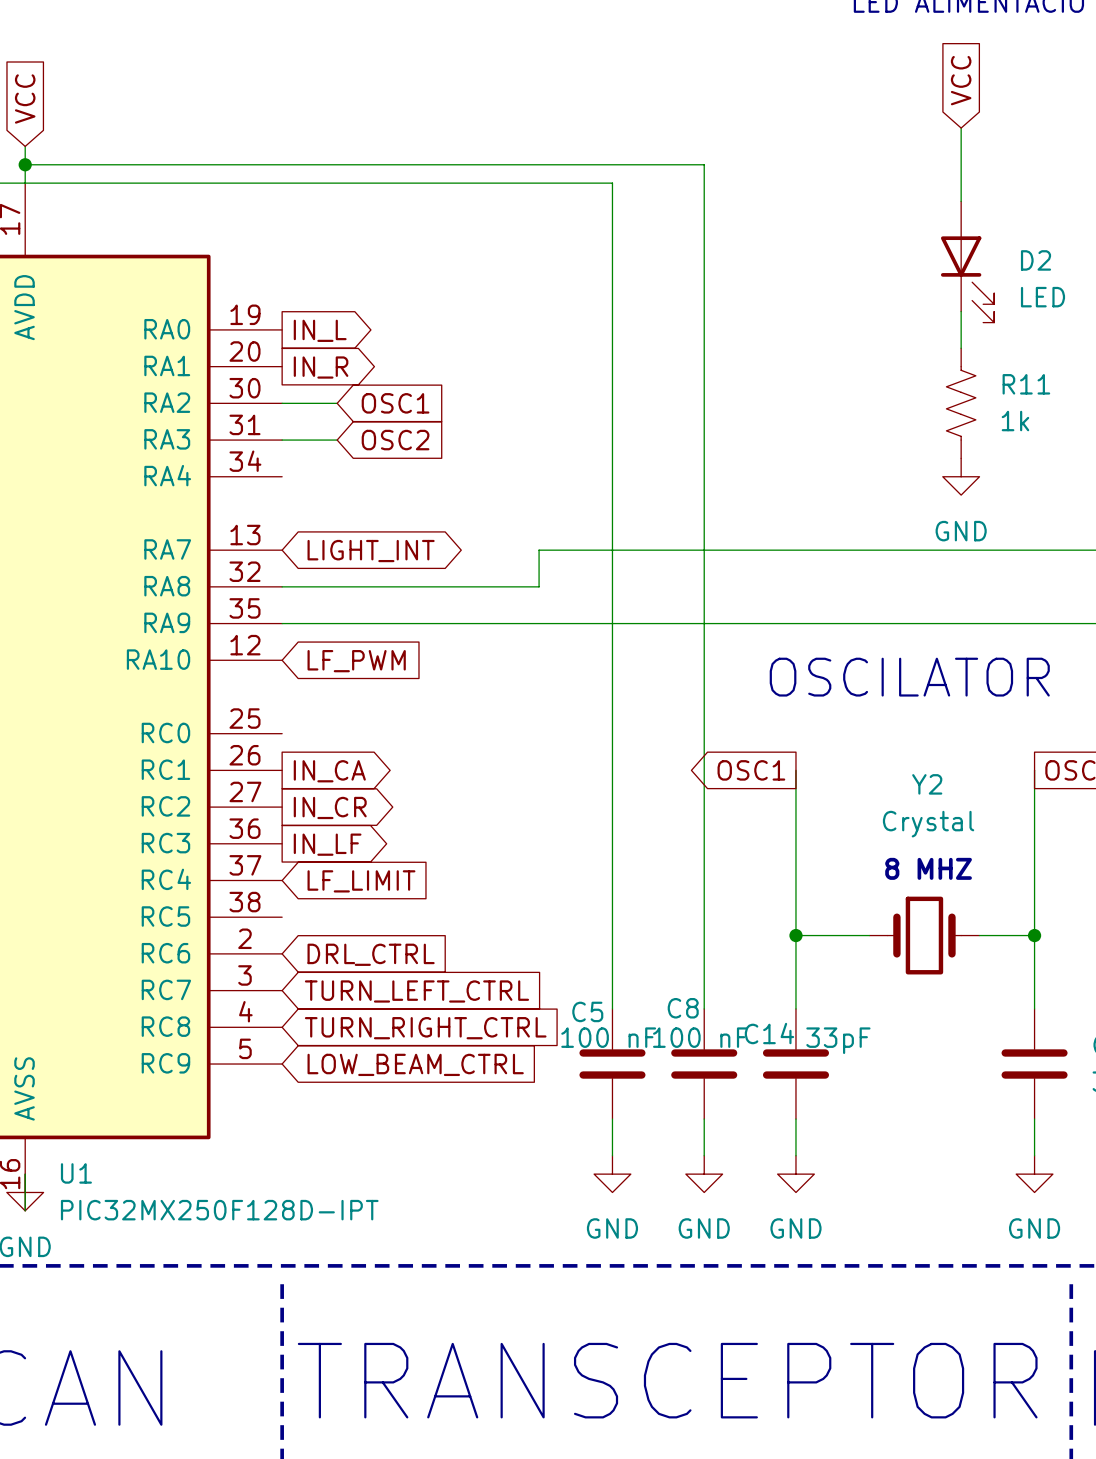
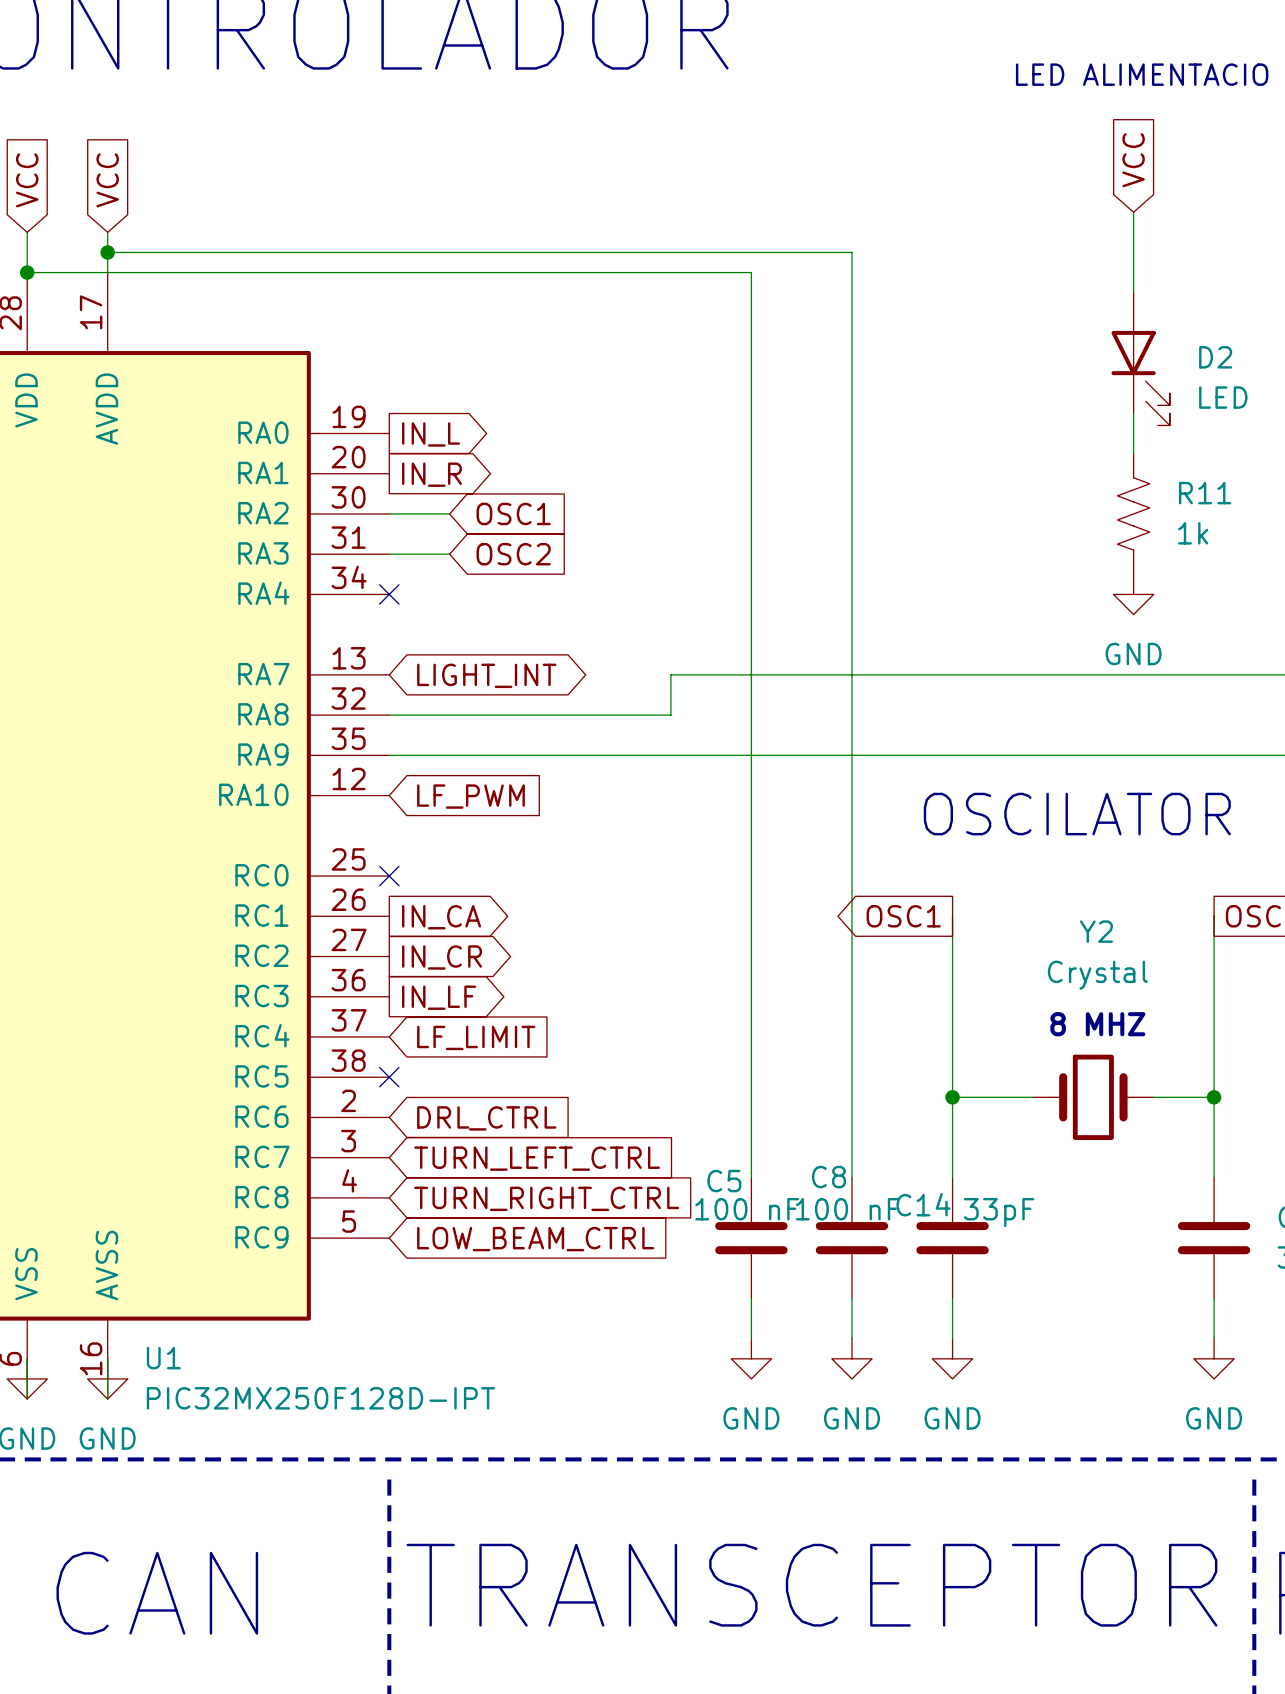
no-connect mark: none -> (389, 594)
no-connect mark: none -> (389, 876)
no-connect mark: none -> (389, 1077)

